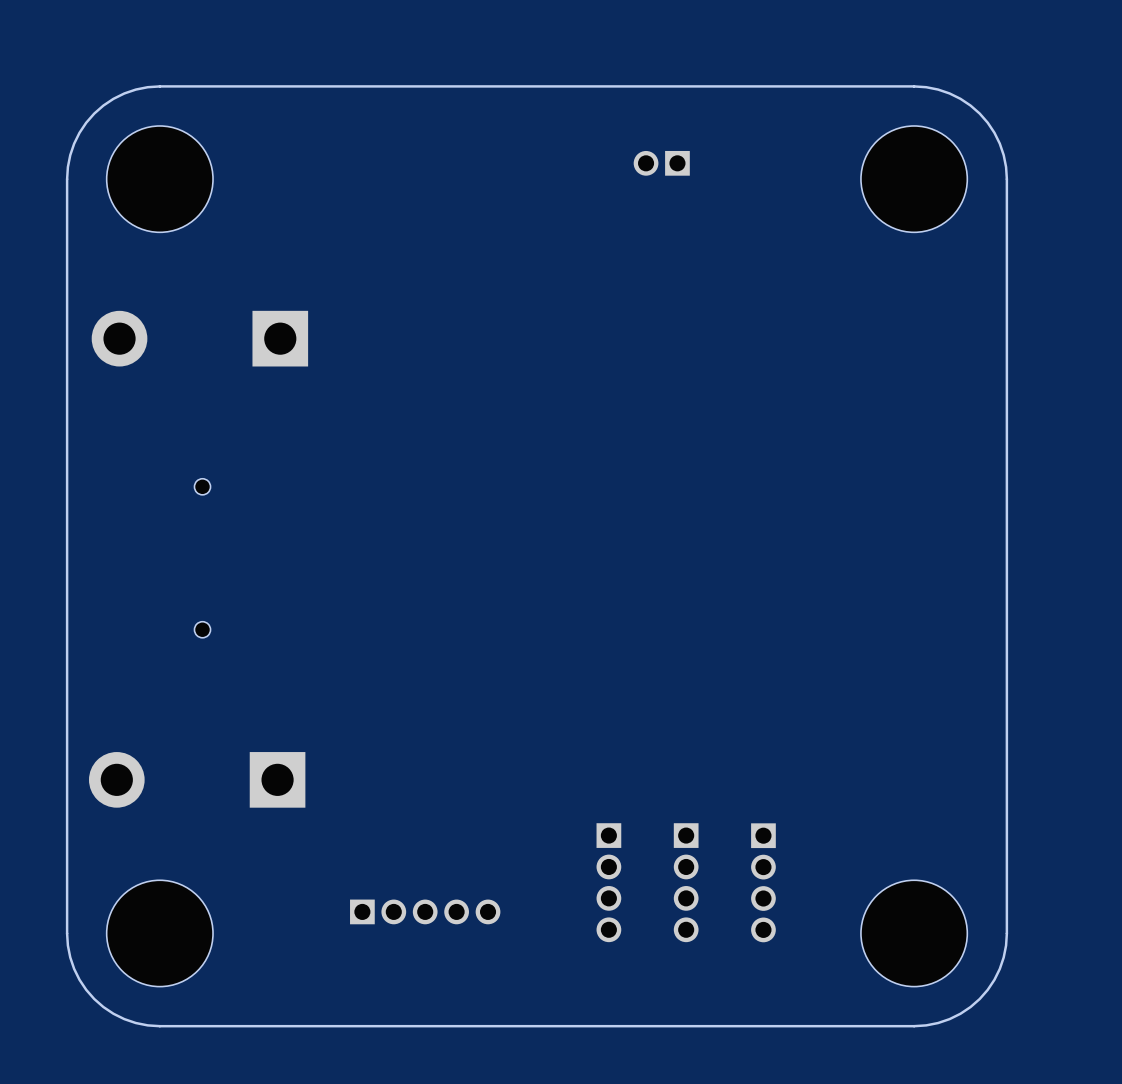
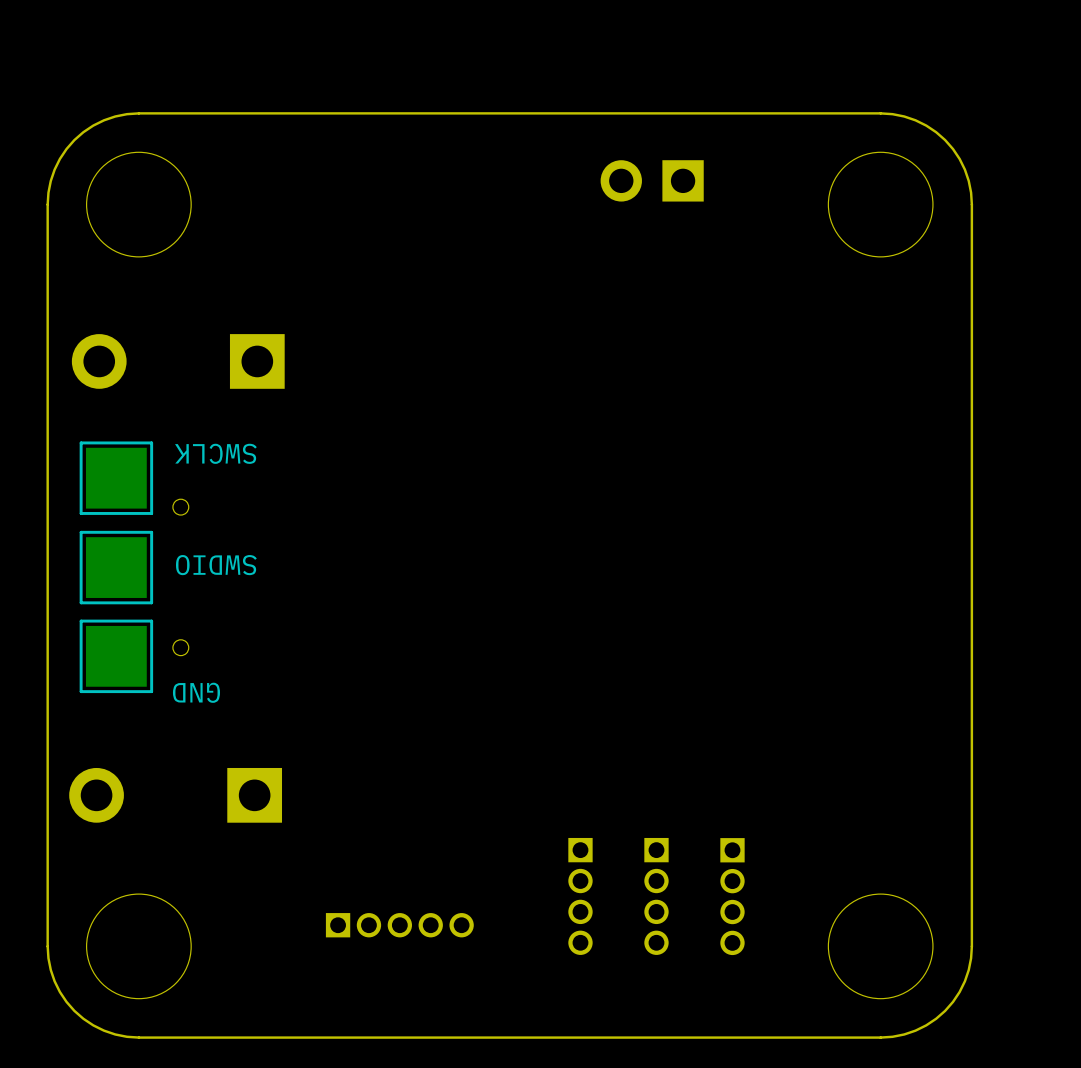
part footprint: [633, 150, 690, 176] -> [600, 160, 704, 202]
text: none -> SWCLK (215, 453)
part: none -> (116, 478)
text: none -> SWDIO (216, 565)
part: none -> (116, 567)
part: none -> (116, 656)
text: none -> GND (196, 692)

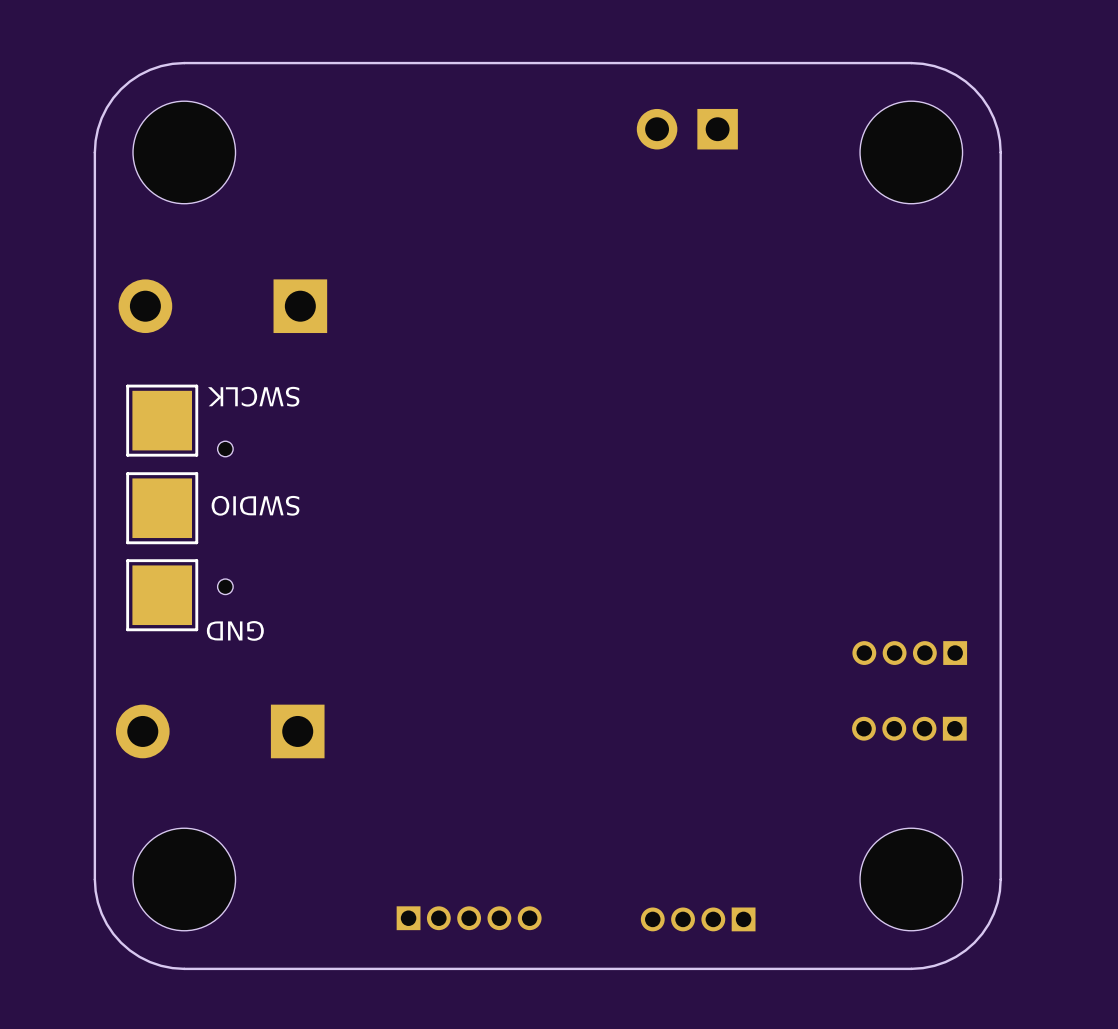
part: none -> (909, 653)
part: none -> (909, 728)
part: (580, 896) -> none
part: (656, 896) -> none
part: (732, 896) -> none
part position: (399, 925) -> (469, 918)
part: none -> (698, 919)

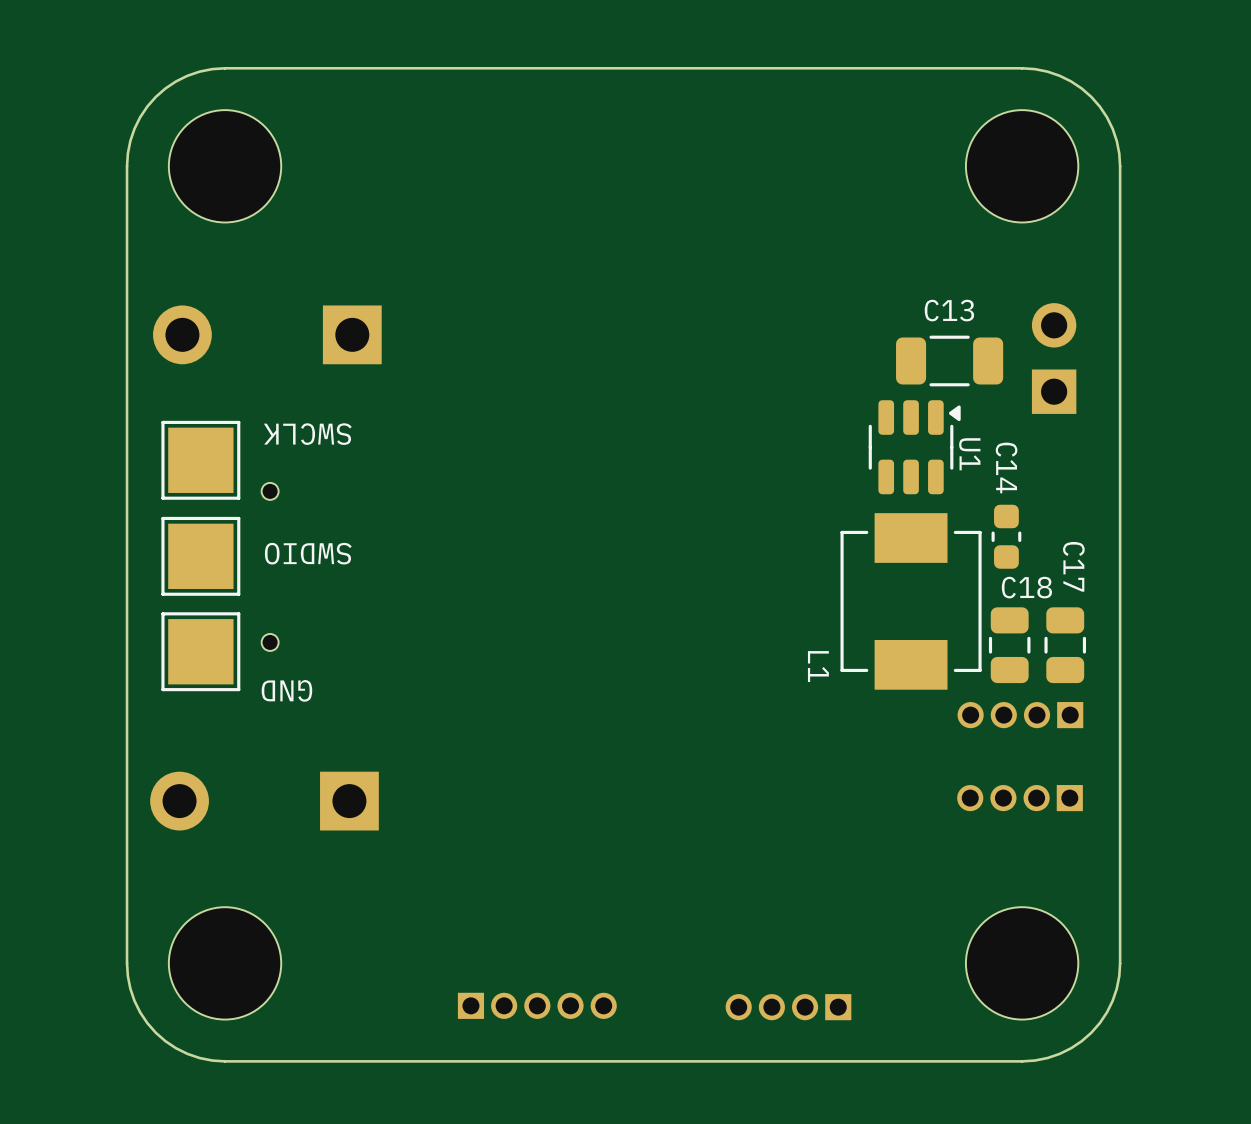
part rotation: 0° (687, 129) -> 90° clockwise (1054, 358)
part position: (687, 129) -> (1054, 358)
C13: none -> (949, 360)
U1: none -> (914, 447)
C14: none -> (1006, 536)
L1: none -> (911, 601)
C18: none -> (1009, 645)
C17: none -> (1065, 645)

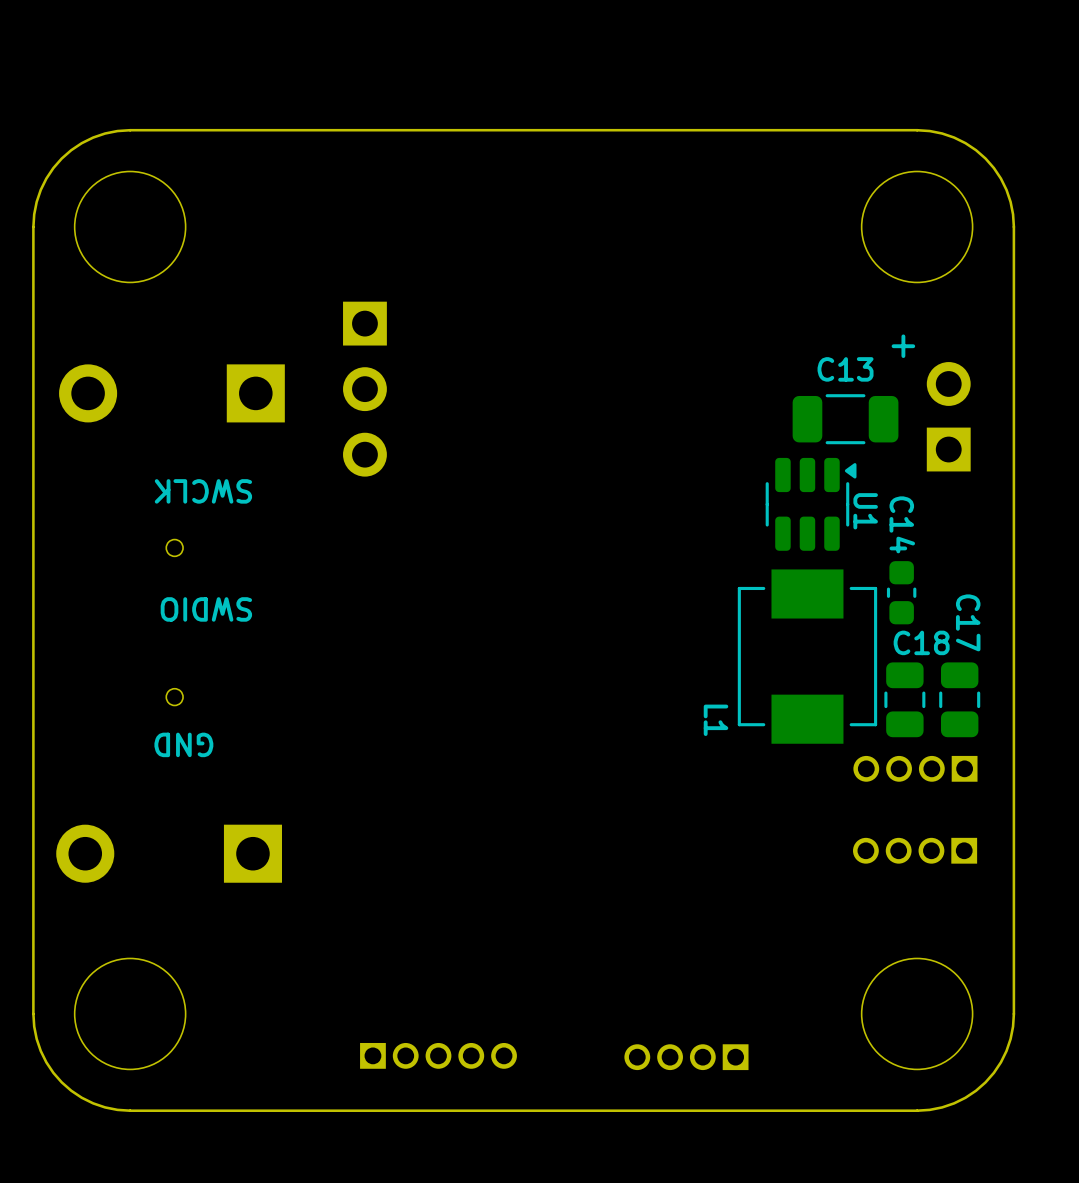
text: none -> + (903, 346)
part: none -> (364, 389)
part: (200, 460) -> none
part: (200, 556) -> none
part: (200, 651) -> none

